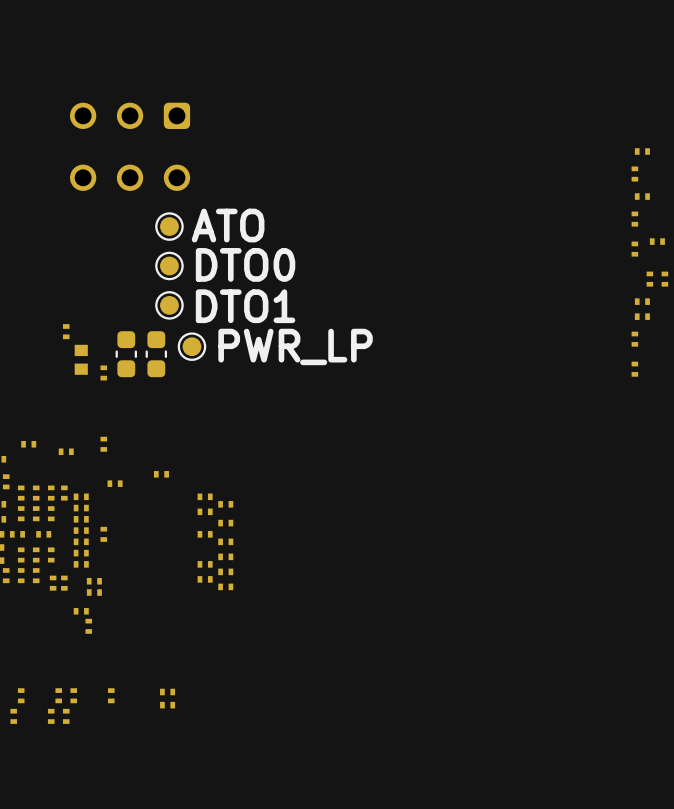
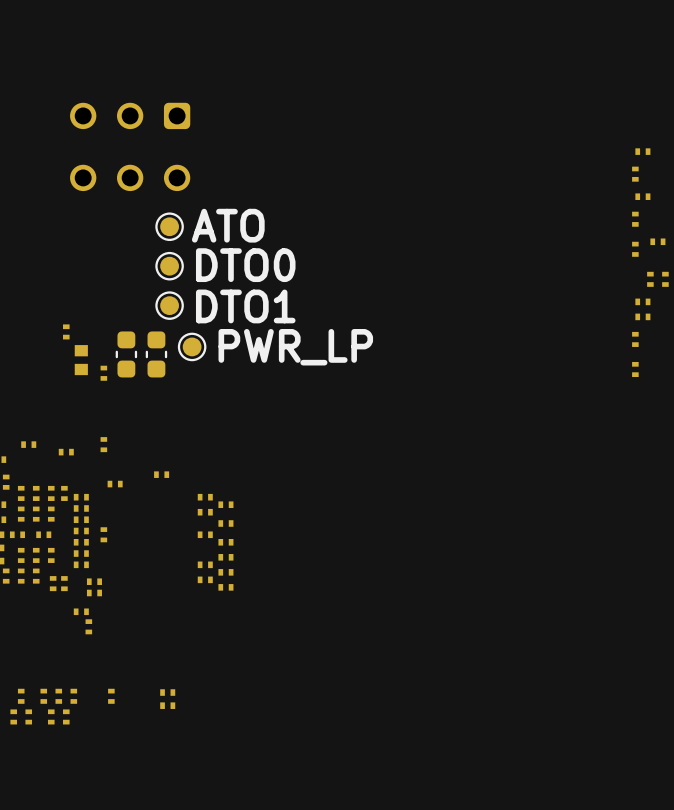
part: none -> (43, 696)
part: none -> (28, 716)

